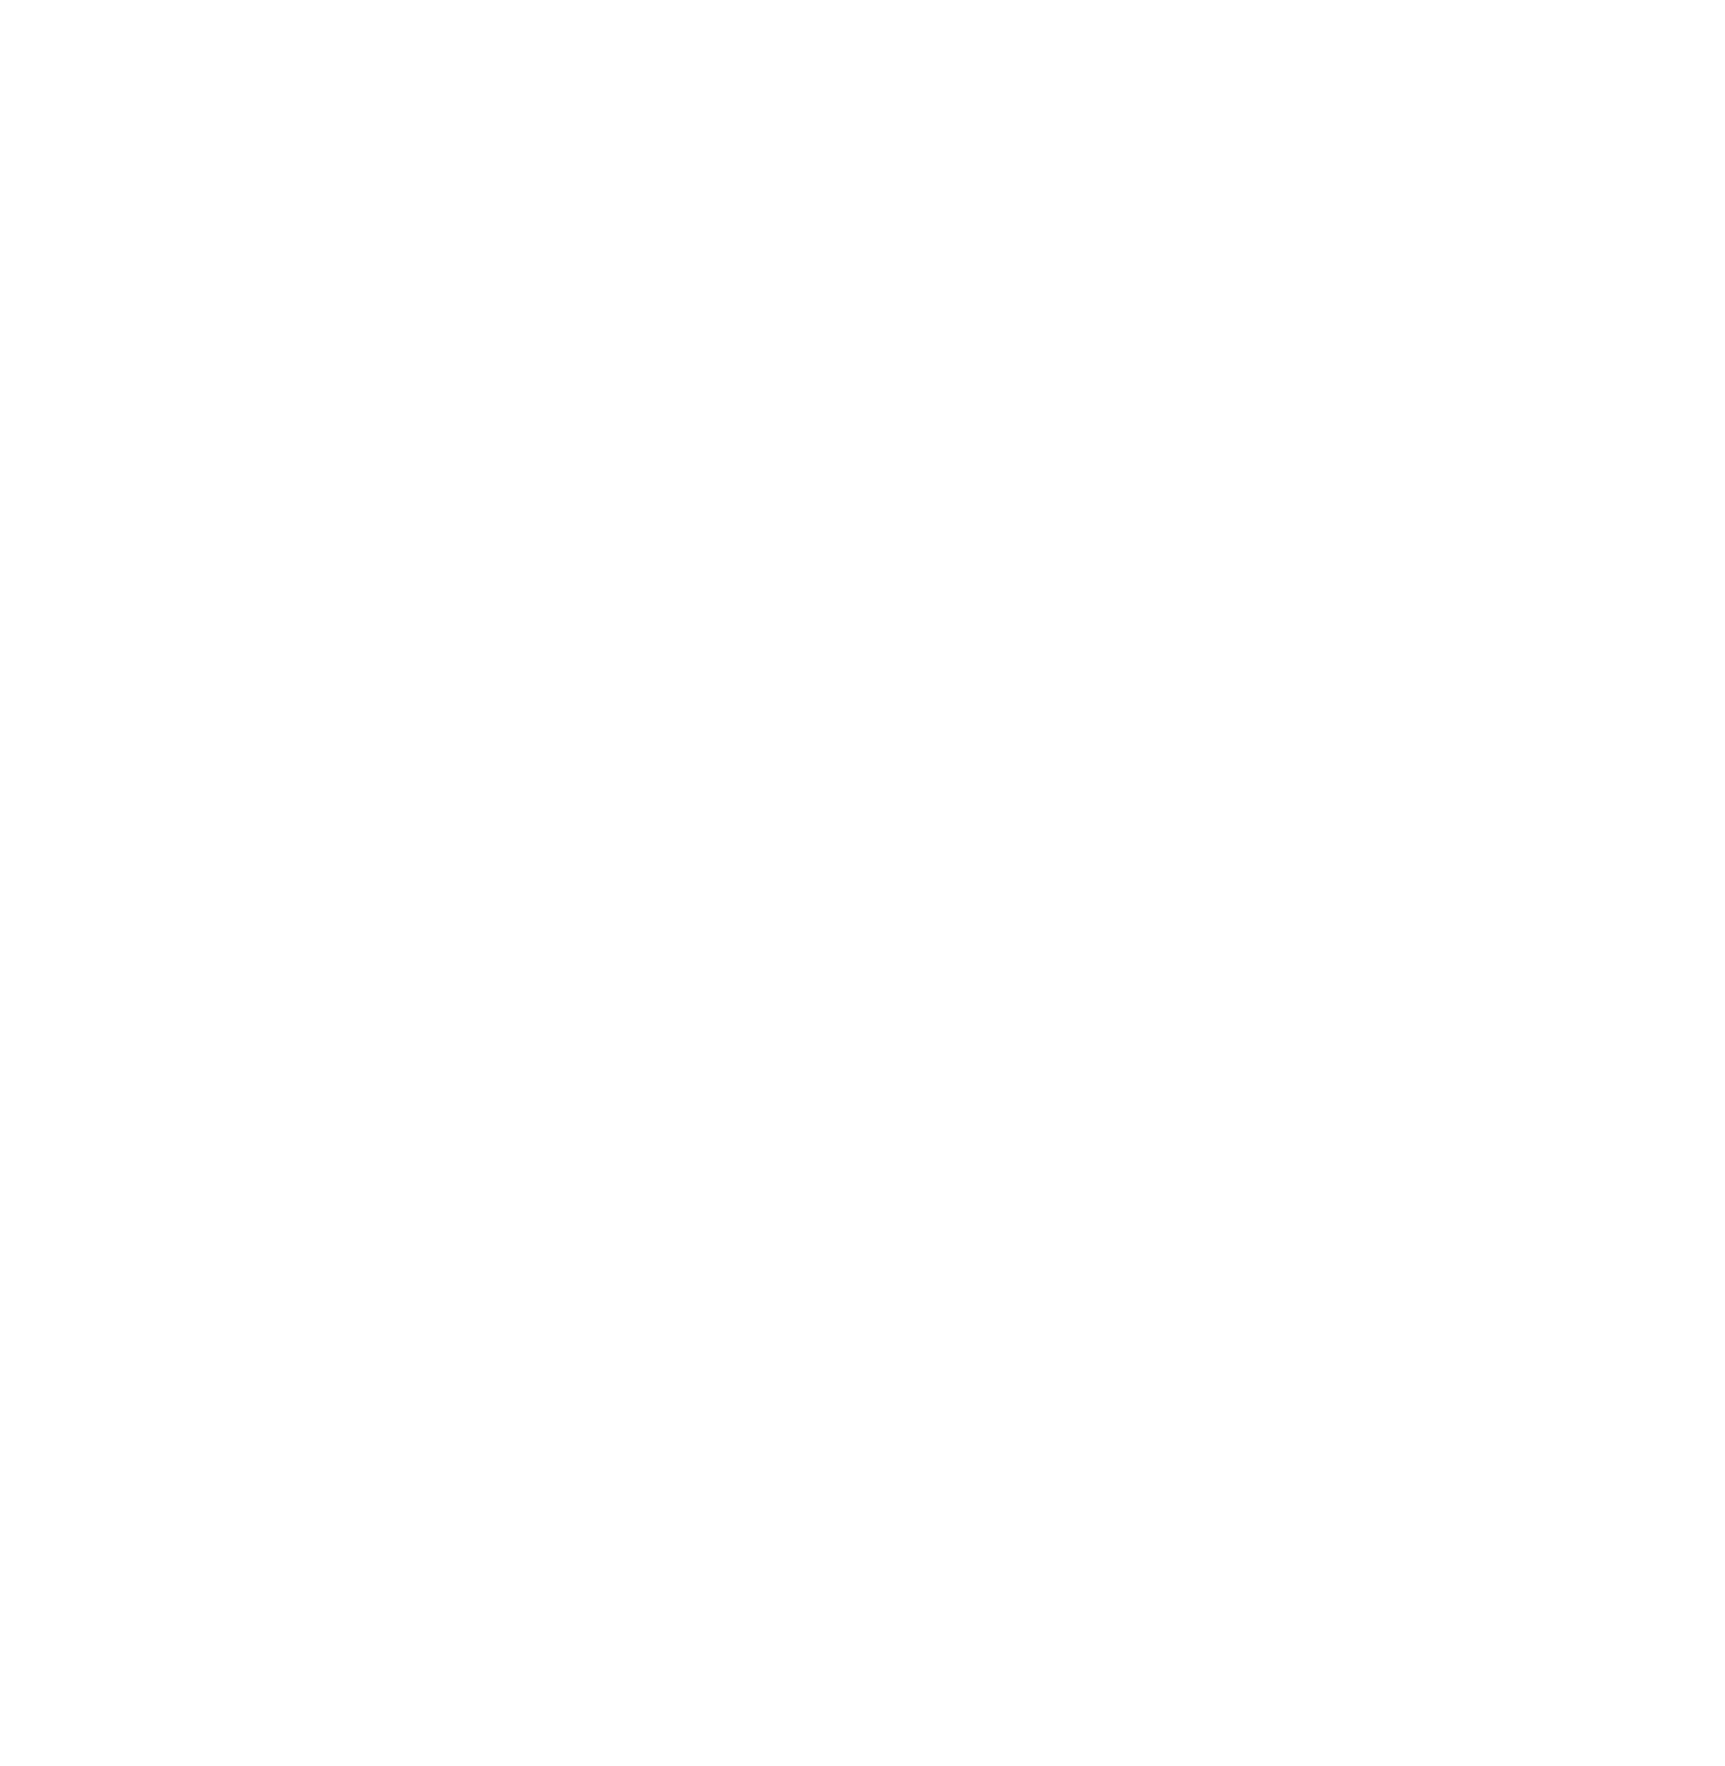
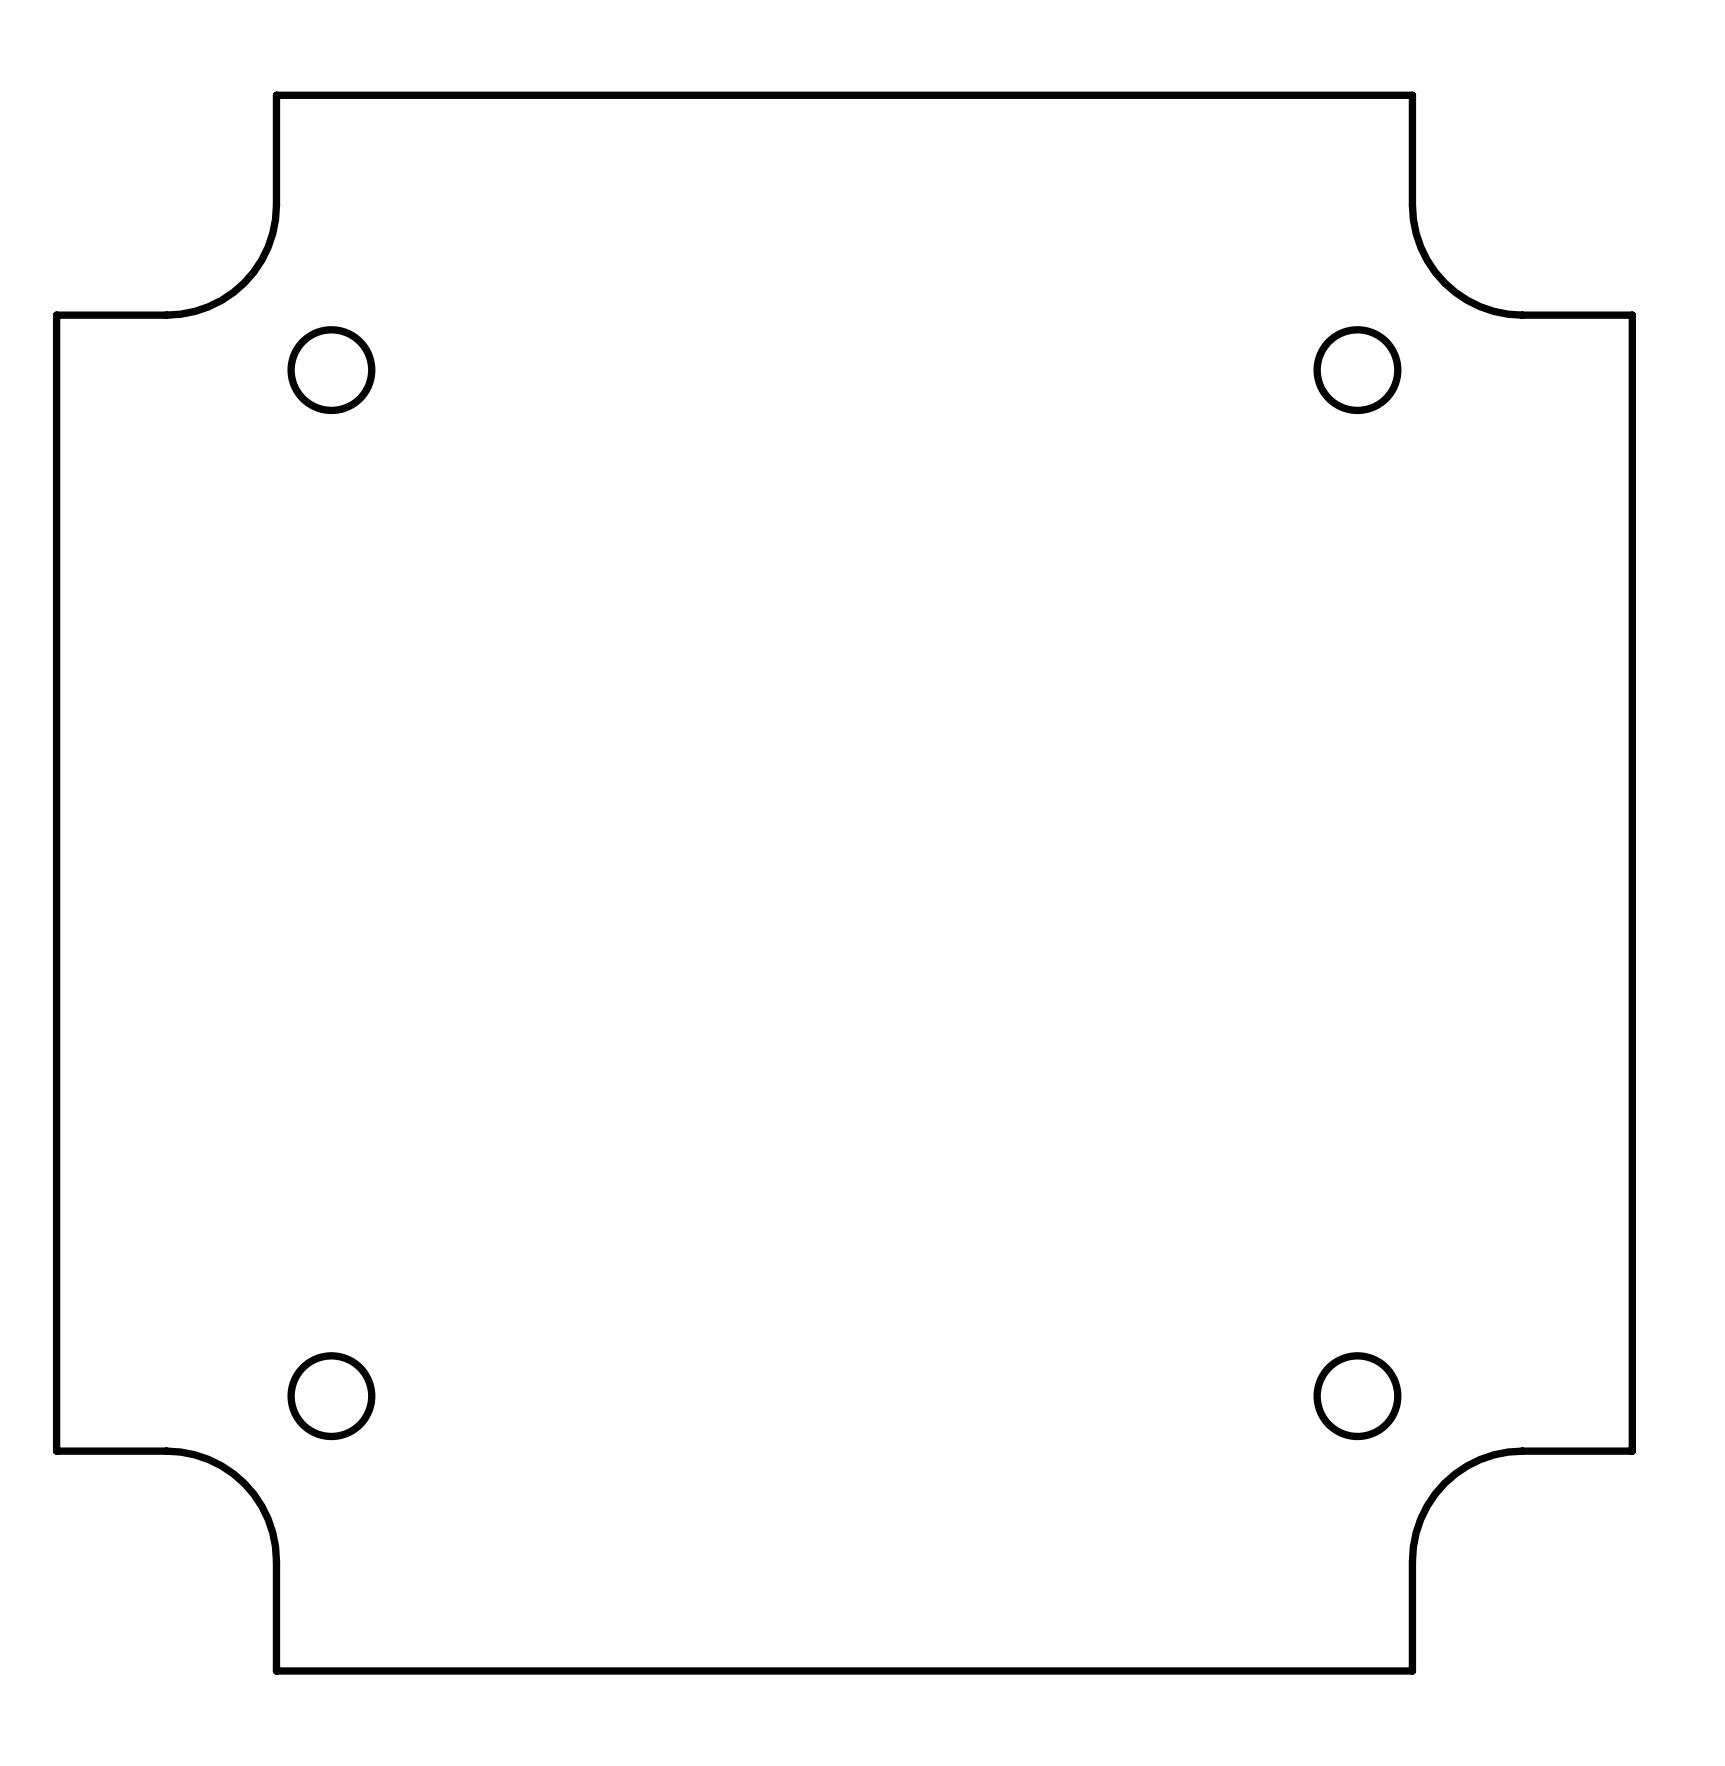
board edge: none -> (276, 95) (275, 219) (268, 247) (253, 272) (244, 282) (233, 292) (208, 306) (180, 314) (56, 315) (56, 1451) (180, 1452) (194, 1454) (221, 1465) (244, 1483) (253, 1494) (268, 1518) (275, 1546) (276, 1670) (1412, 1670) (1413, 1546) (1420, 1518) (1427, 1506) (1444, 1483) (1467, 1465) (1493, 1454) (1508, 1452) (1632, 1451) (1632, 315) (1508, 314) (1480, 306) (1467, 300) (1444, 282) (1427, 260) (1420, 247) (1413, 219) (1412, 95) (276, 95)
round board edge: none -> [287, 326, 376, 415]
round board edge: none -> [1313, 326, 1402, 415]
round board edge: none -> [287, 1352, 376, 1441]
round board edge: none -> [1313, 1352, 1402, 1441]

